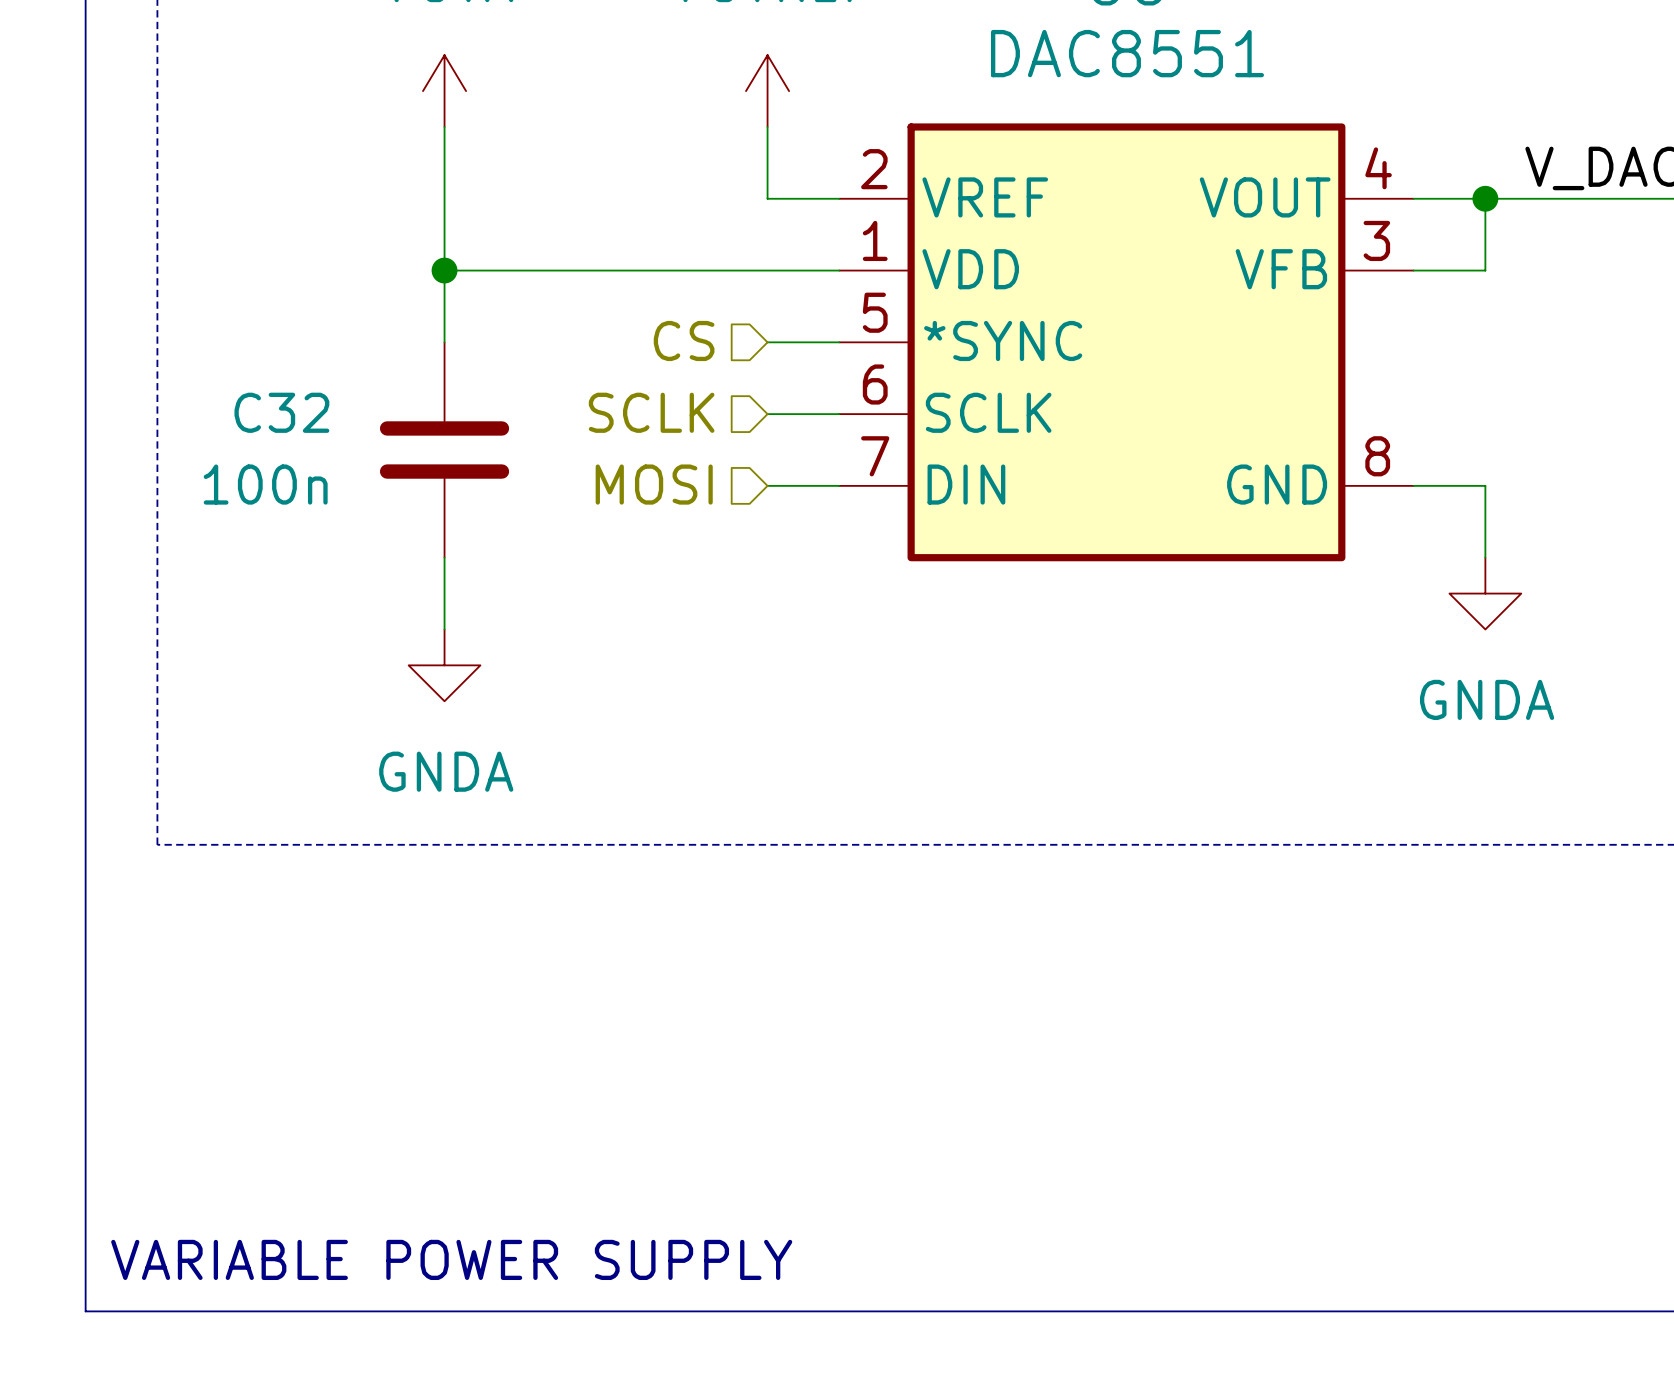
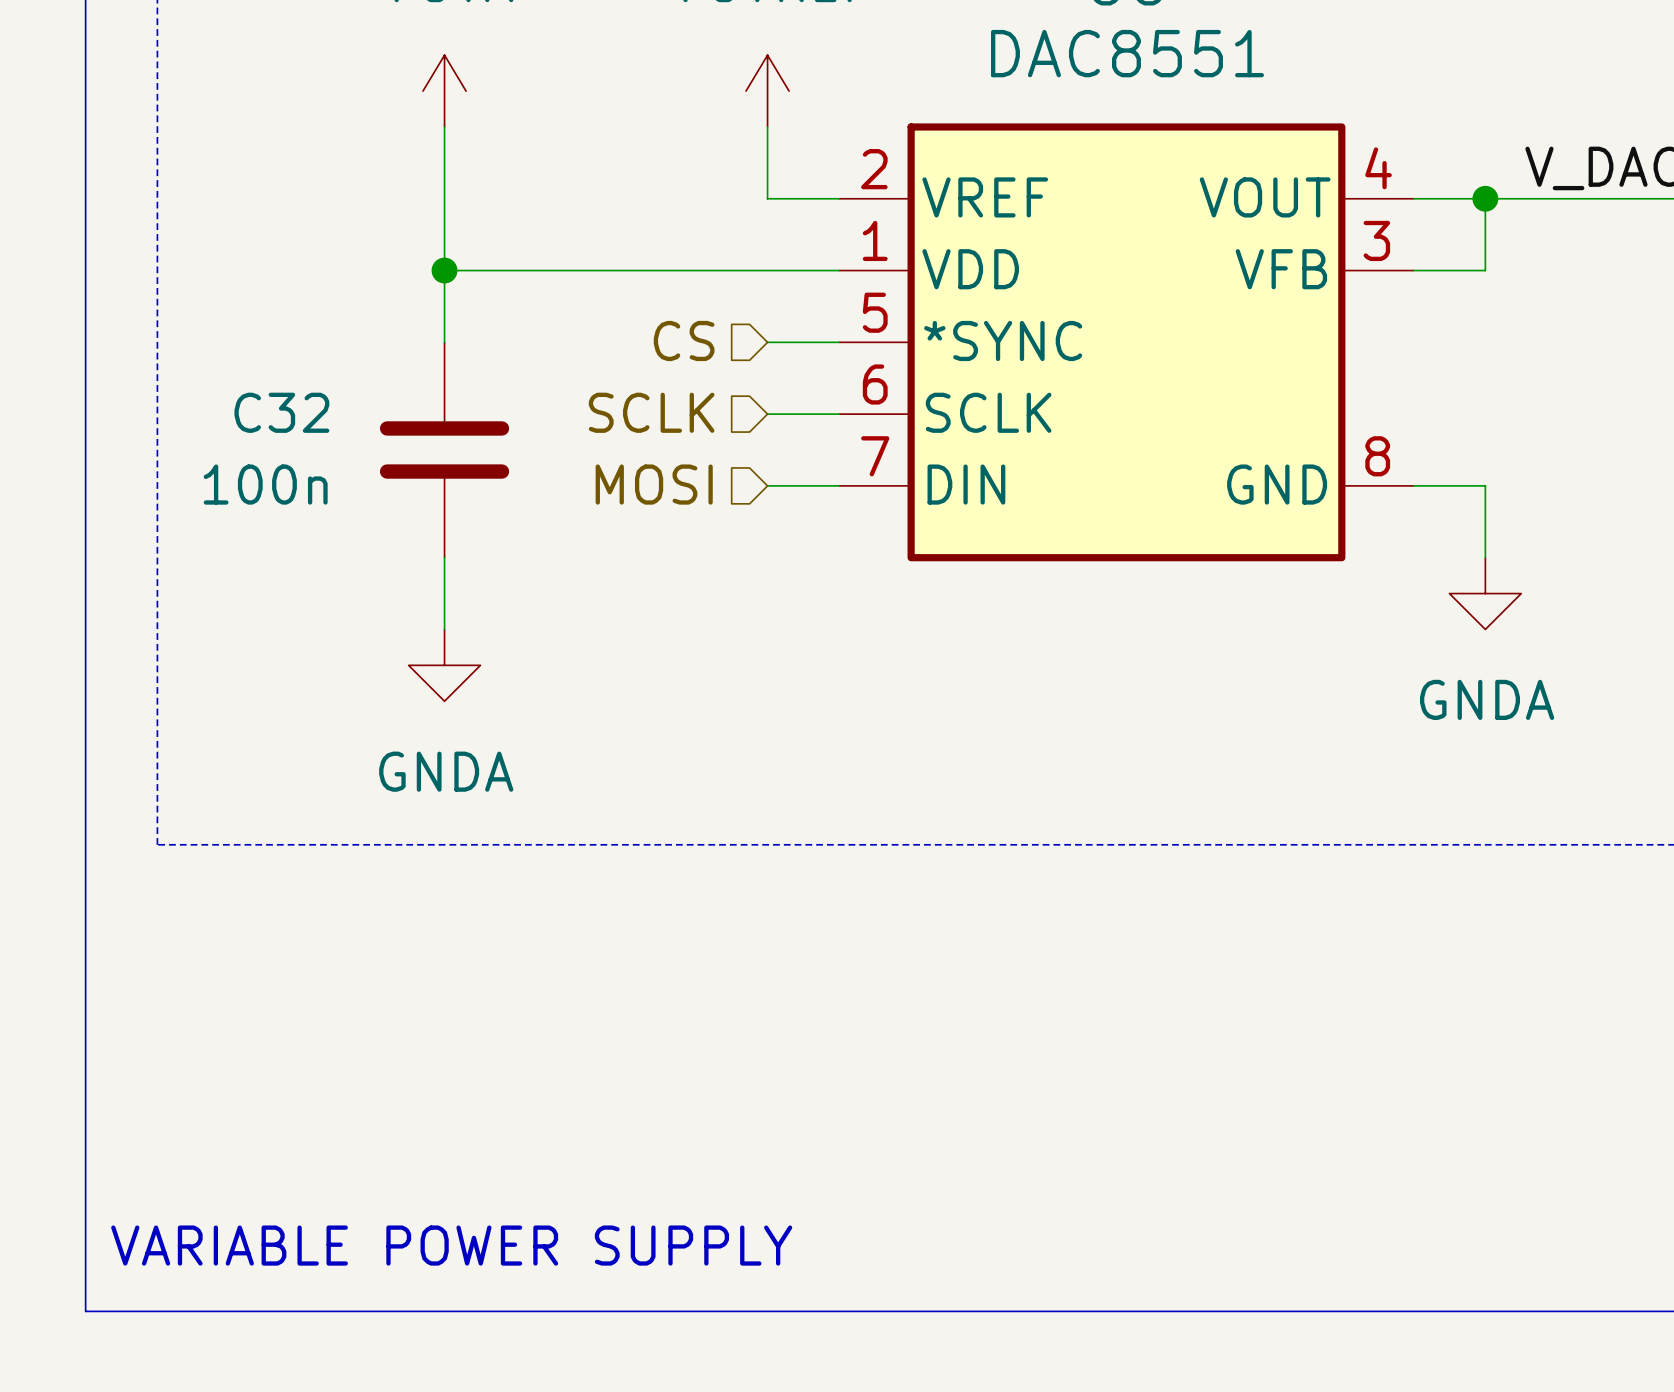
text position: VARIABLE POWER SUPPLY (451, 1259) -> VARIABLE POWER SUPPLY (451, 1245)

